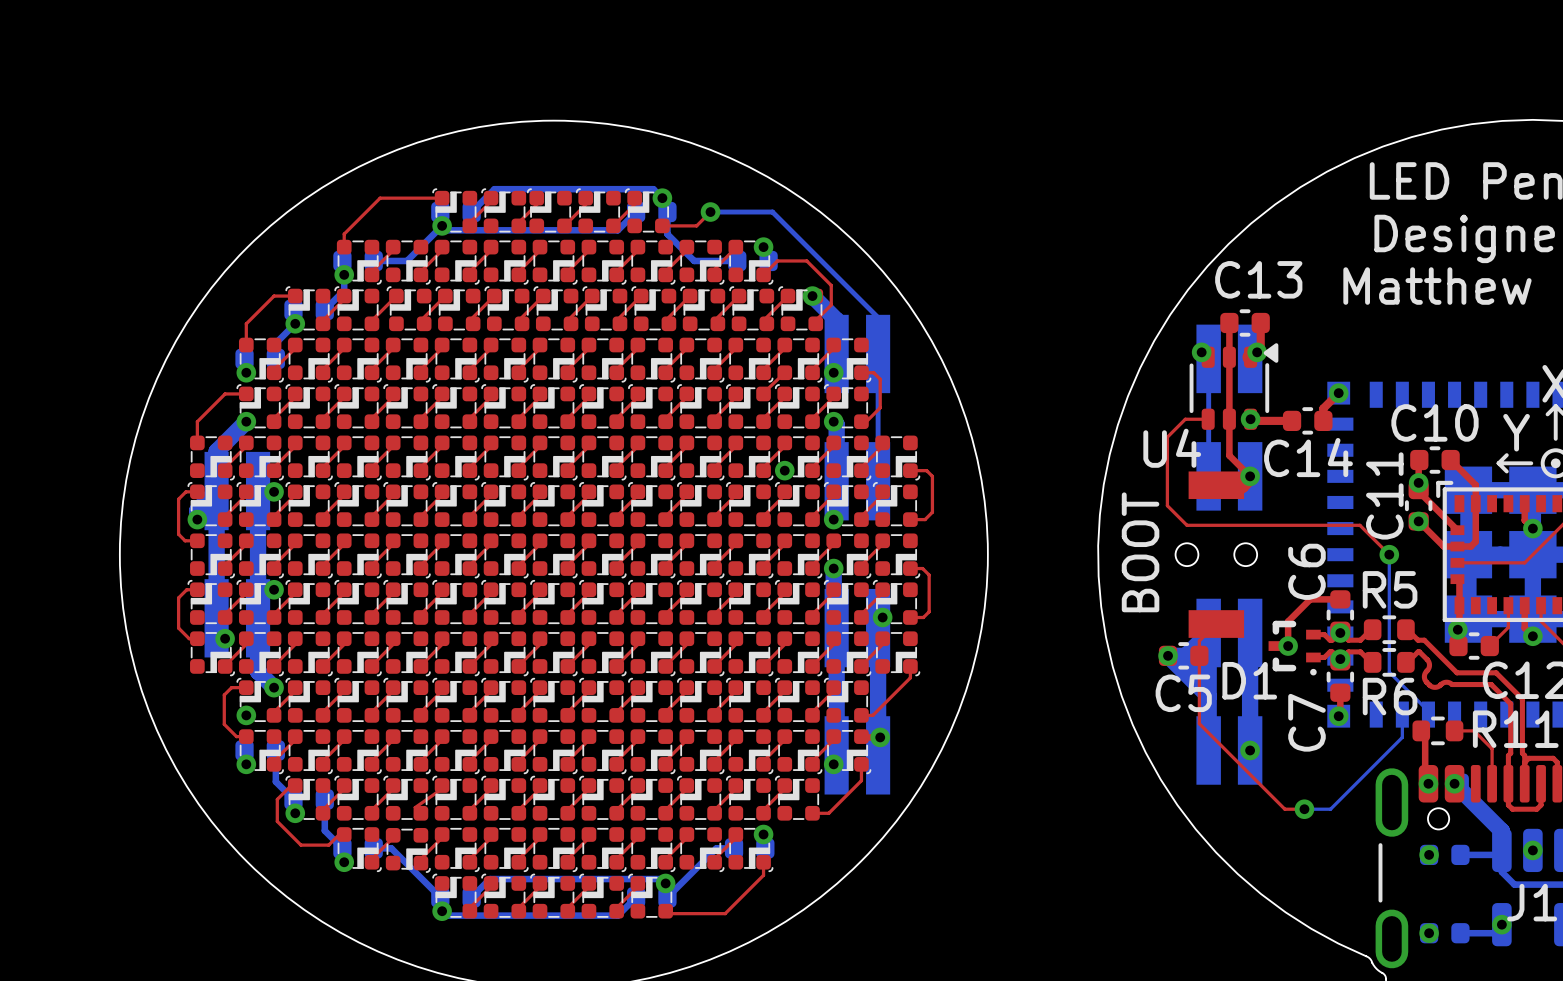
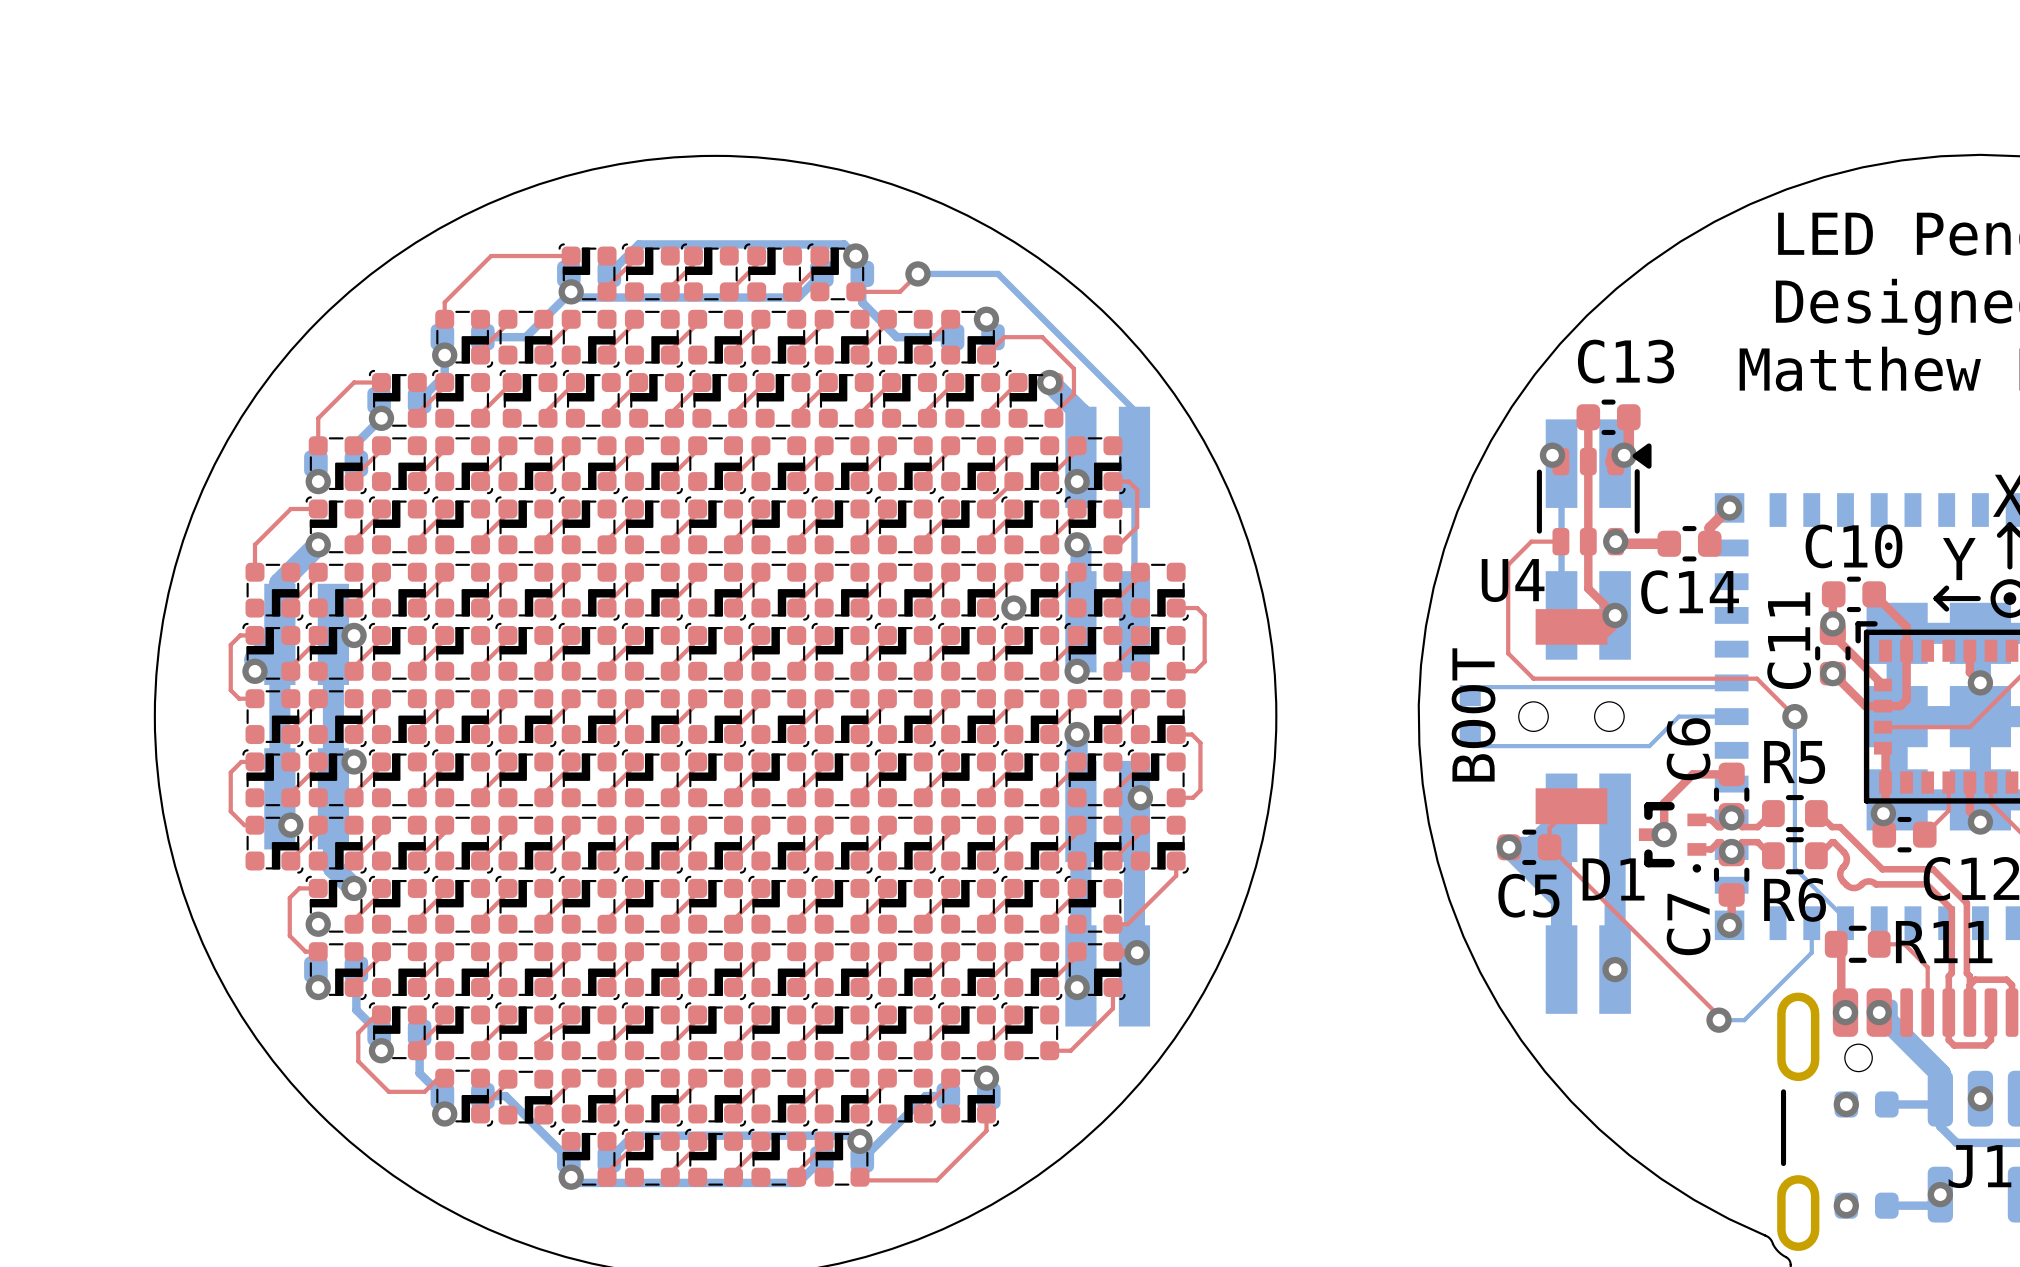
bottom track: none -> (1731, 682) (1727, 687) (1478, 687) (1470, 695)
part: none -> (1470, 695)
bottom track: none -> (1731, 716) (1678, 716) (1649, 746) (1482, 746) (1470, 733)
part: none -> (1470, 733)
top track: (1199, 655) (1199, 723) (1284, 809) (1304, 809) -> (1550, 847) (1719, 1015) (1719, 1020)
bottom track: (1350, 789) (1330, 809) (1304, 809) -> (1744, 1020) (1719, 1020)
via position: (1304, 809) -> (1719, 1020)

